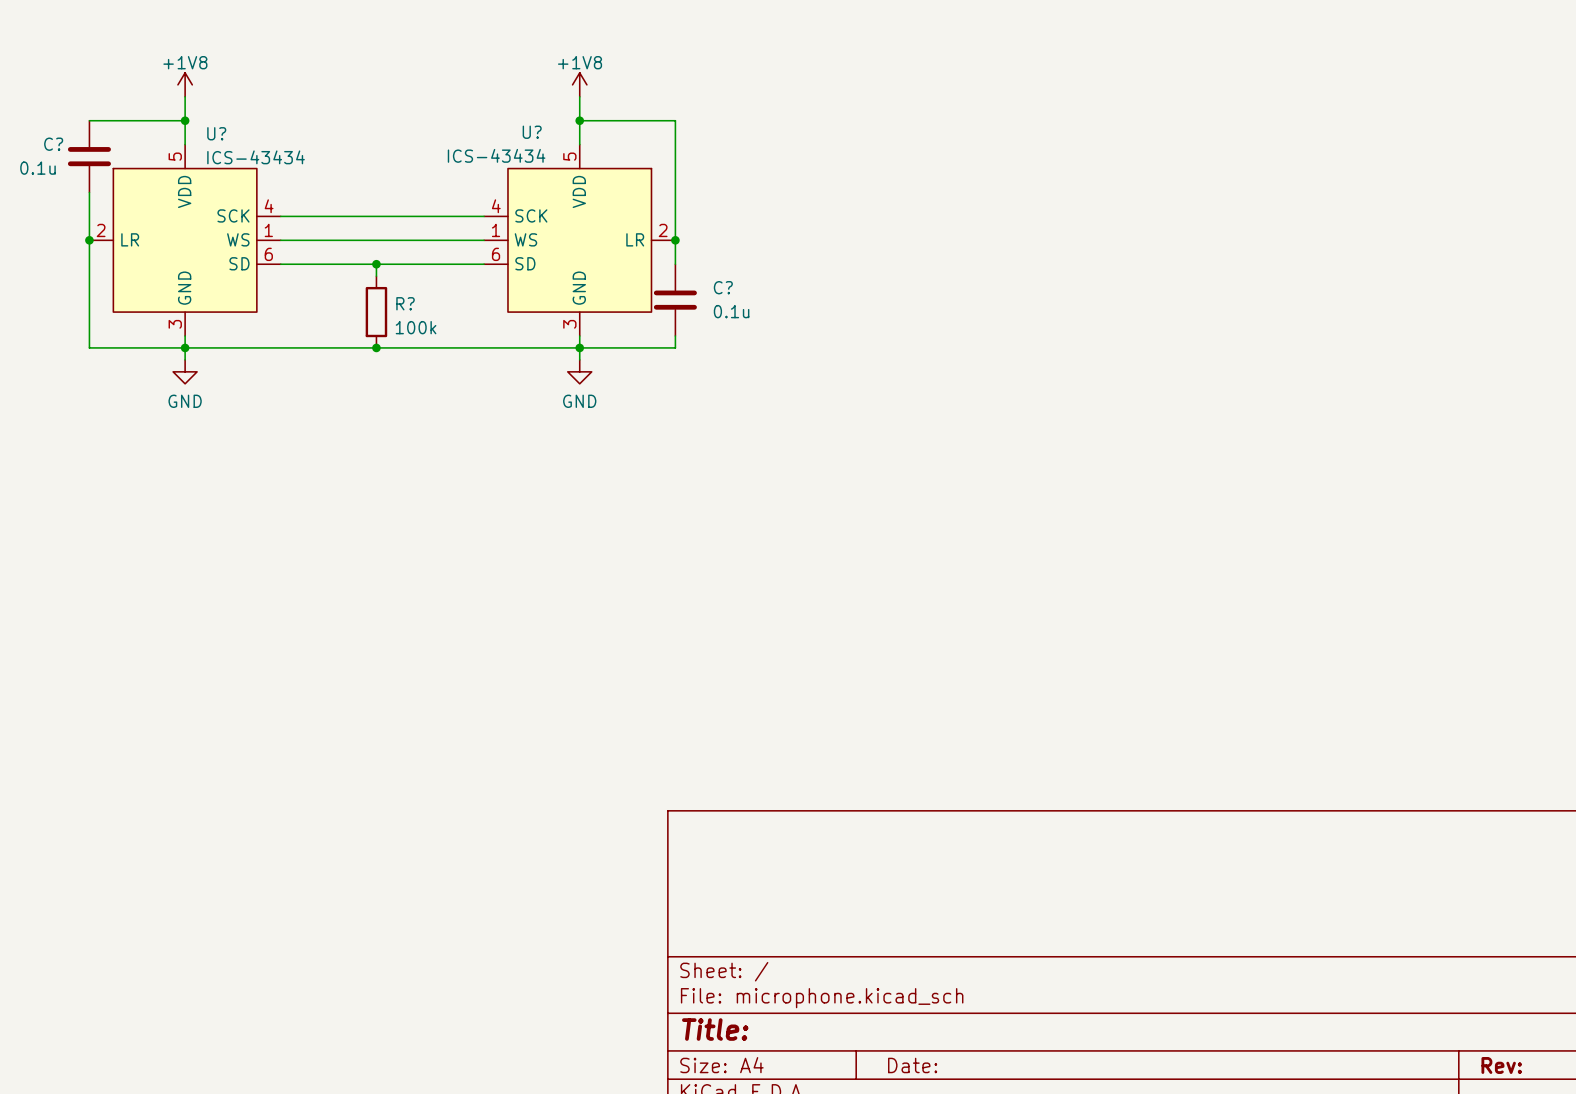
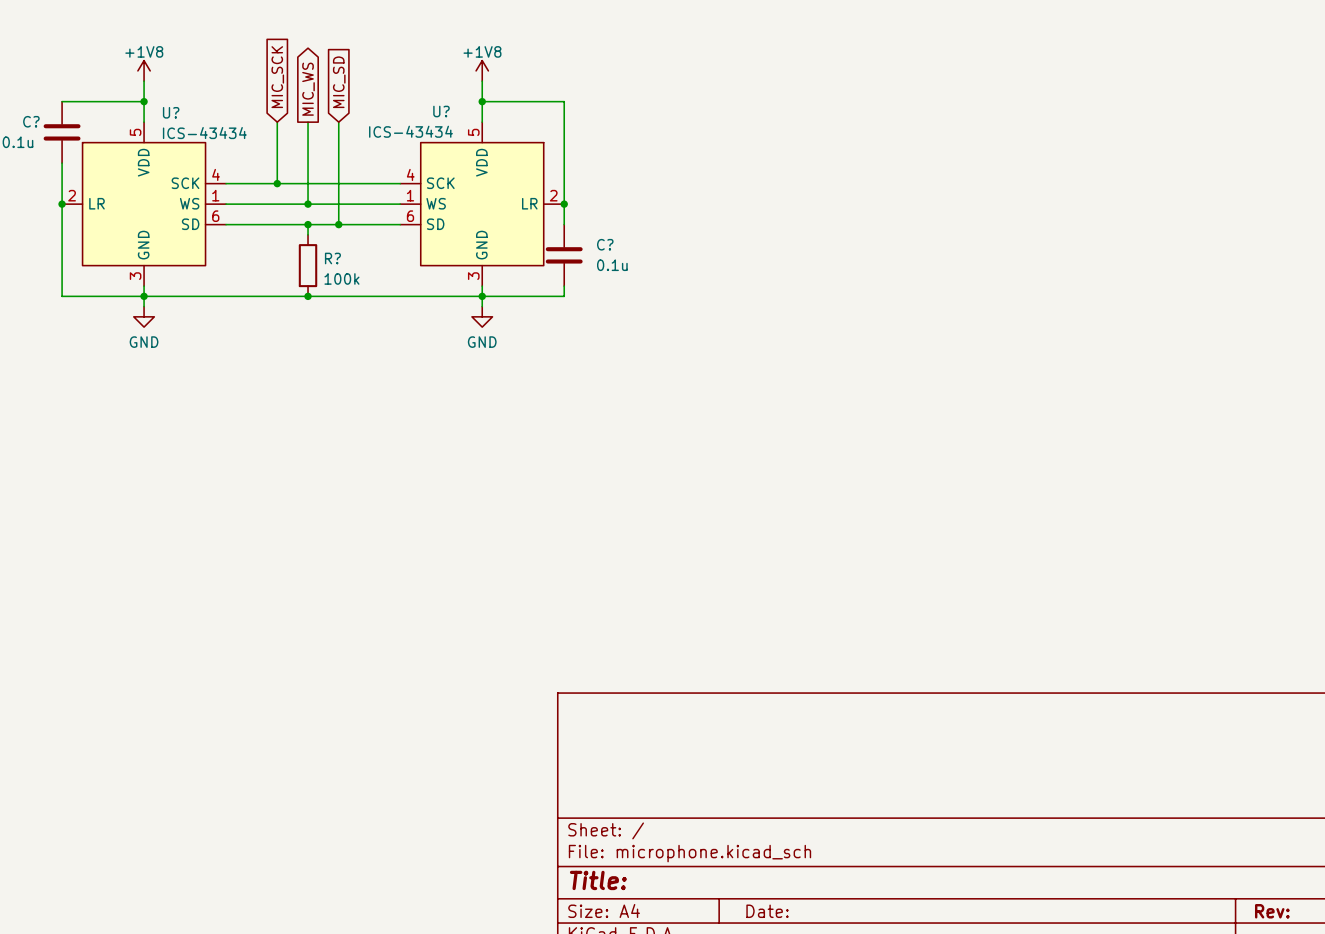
global label: none -> MIC_SCK (277, 77)
global label: none -> MIC_SD (339, 82)
global label: none -> MIC_WS (308, 89)
wire: none -> (277, 122) (277, 183)
wire: none -> (308, 122) (308, 204)
wire: none -> (338, 122) (338, 224)
junction: none -> (277, 183)
junction: none -> (308, 204)
junction: none -> (338, 224)

